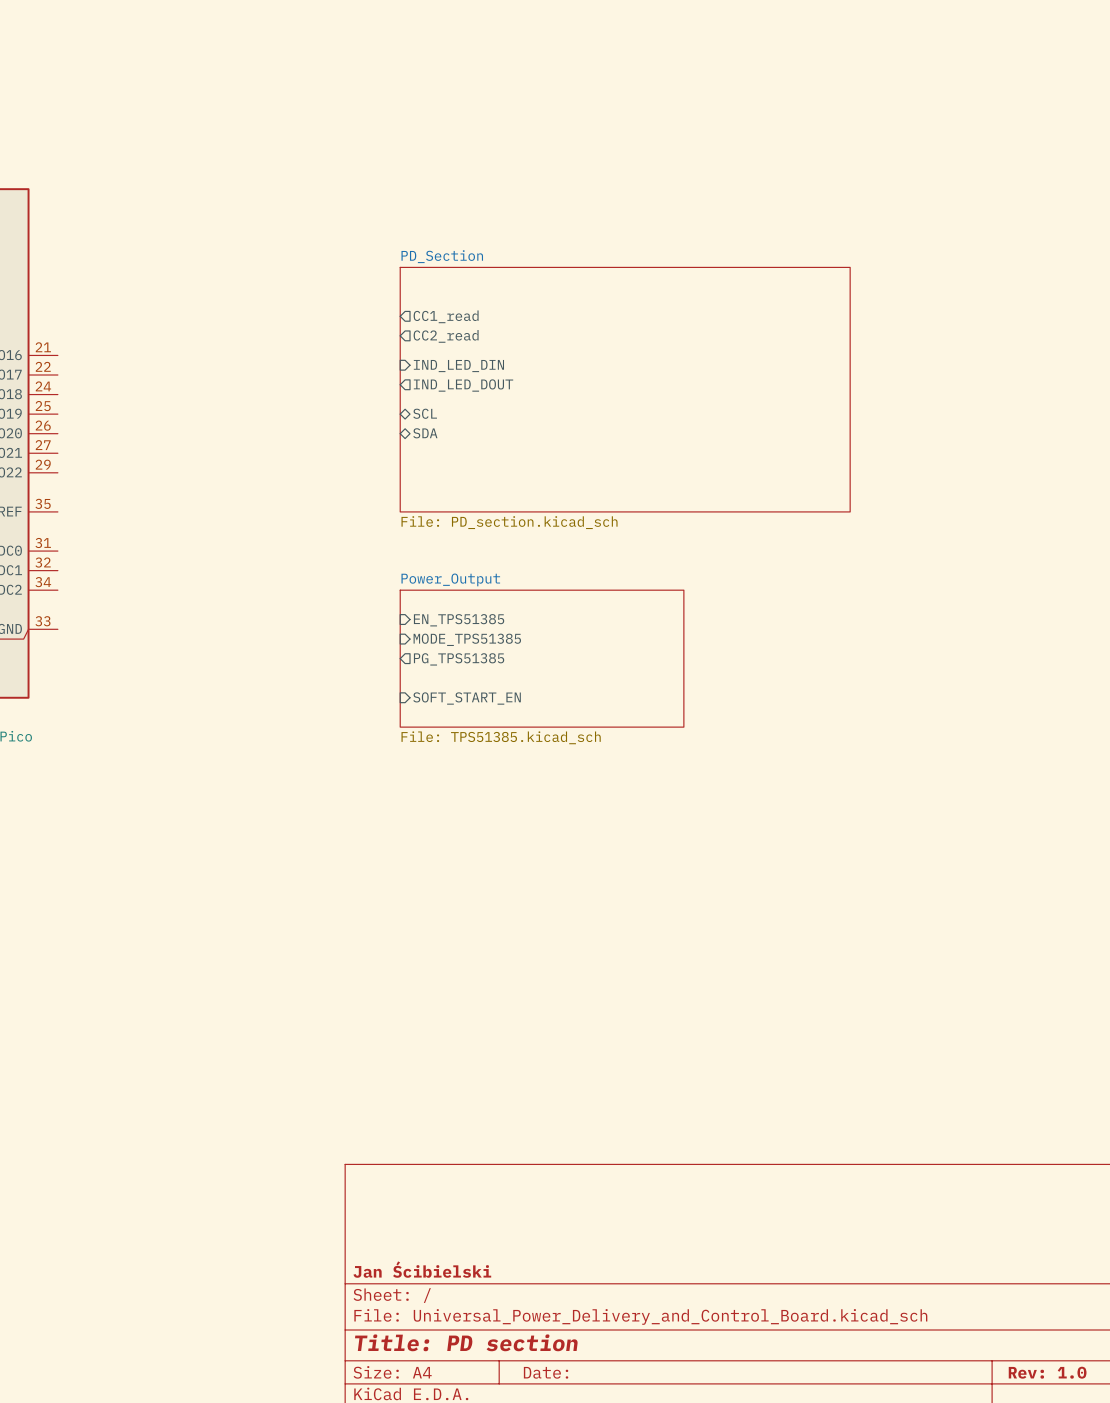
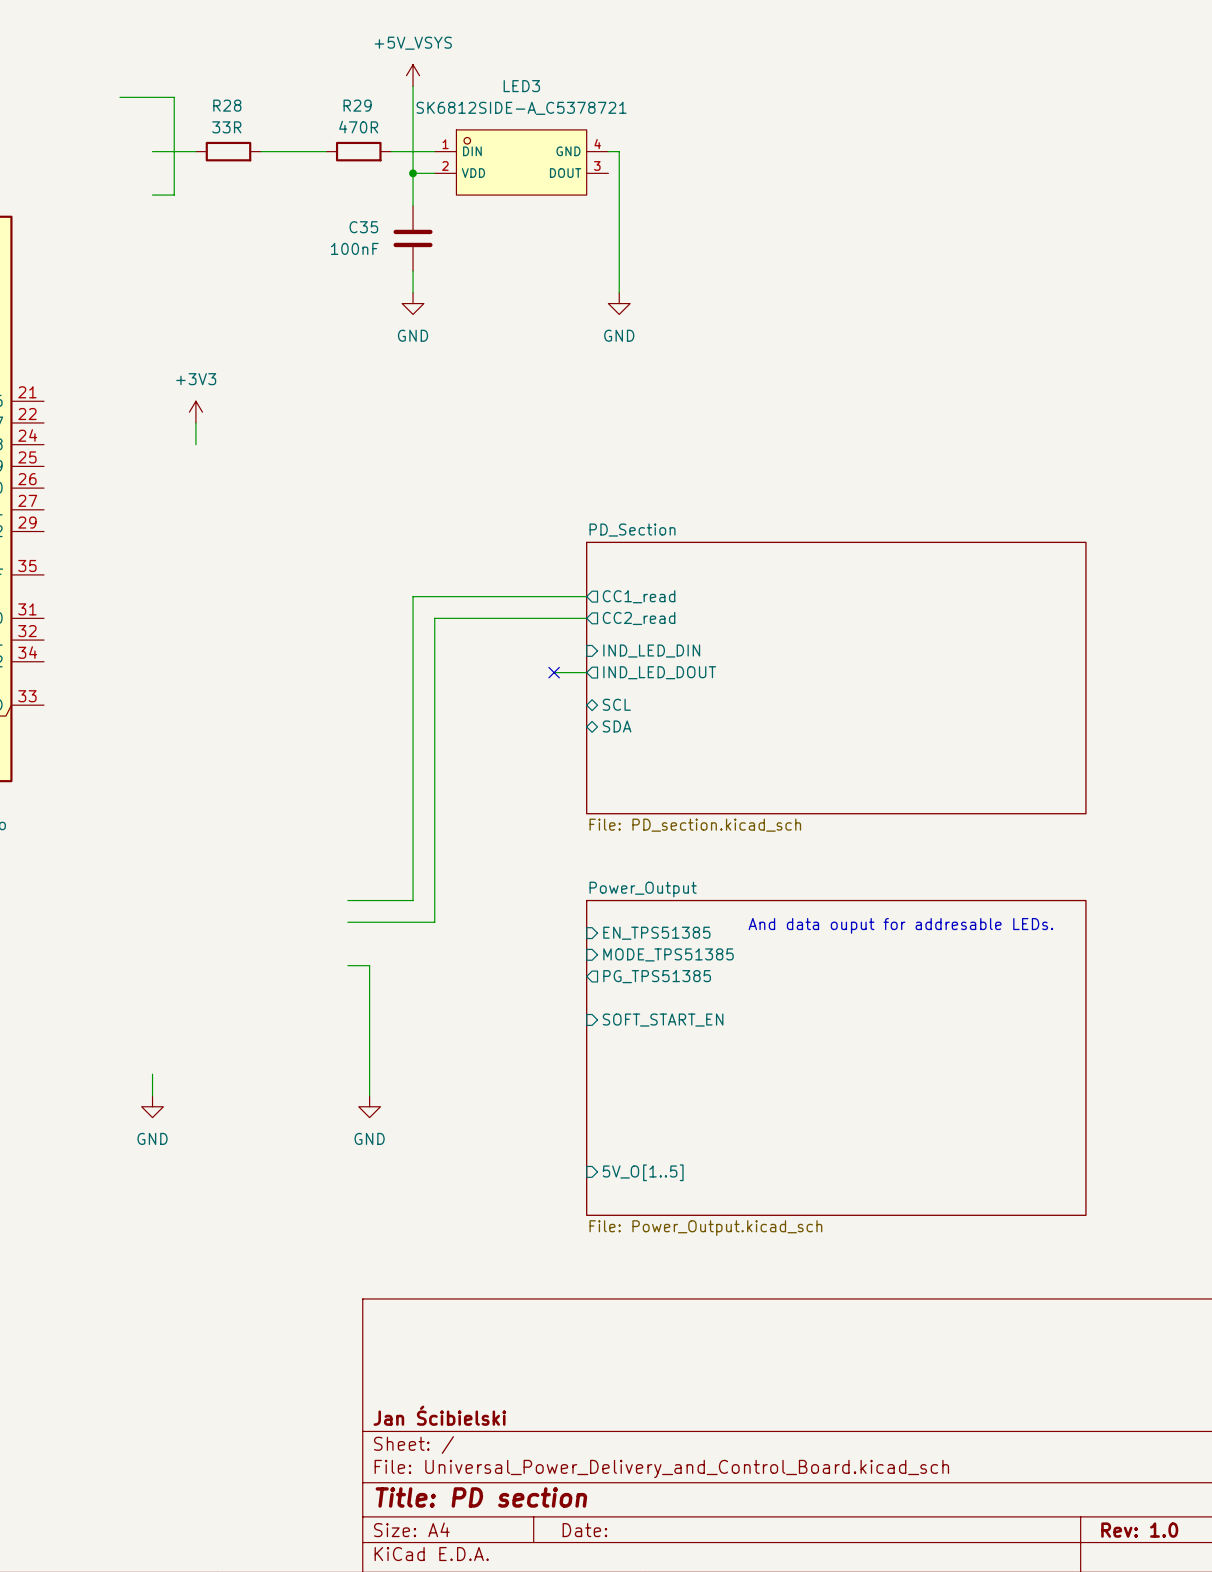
power symbol: none -> +5V_VSYS (413, 75)
wire: none -> (413, 86) (413, 205)
wire: none -> (119, 97) (174, 97) (174, 195) (152, 195)
wire: none -> (152, 151) (195, 151)
R28: none -> 33R (228, 151)
wire: none -> (261, 151) (326, 151)
R29: none -> 470R (358, 151)
wire: none -> (391, 151) (434, 151)
wire: none -> (608, 151) (619, 151) (619, 292)
LED3: none -> SK6812SIDE-A_C5378721 (521, 162)
wire: none -> (413, 173) (434, 173)
junction: none -> (413, 173)
C35: none -> 100nF (413, 238)
wire: none -> (413, 271) (413, 292)
power symbol: none -> GND (413, 303)
power symbol: none -> GND (619, 303)
sheet pin: CC1_read (446, 316) -> none
sheet pin: CC2_read (446, 336) -> none
power symbol: none -> +3V3 (195, 412)
sheet pin: IND_LED_DIN (458, 366) -> none
wire: none -> (195, 422) (195, 444)
sheet pin: IND_LED_DOUT (463, 385) -> none
sheet PD_Section: File: PD_section.kicad_sch (625, 389) -> none
sheet pin: SCL (425, 413) -> none
sheet pin: SDA (425, 433) -> none
wire: none -> (586, 596) (413, 596) (413, 900) (347, 900)
sheet pin: none -> CC1_read (639, 596)
wire: none -> (586, 618) (434, 618) (434, 922) (347, 922)
sheet pin: none -> CC2_read (639, 618)
sheet pin: none -> IND_LED_DIN (651, 651)
wire: none -> (554, 672) (586, 672)
no-connect mark: none -> (554, 672)
sheet pin: none -> IND_LED_DOUT (659, 672)
sheet PD_Section: none -> File: PD_section.kicad_sch (836, 678)
sheet pin: EN_TPS51385 (459, 620) -> none
sheet pin: none -> SCL (616, 704)
sheet pin: MODE_TPS51385 (467, 639) -> none
sheet pin: none -> SDA (617, 726)
sheet Power_Output: File: TPS51385.kicad_sch (542, 658) -> none
sheet pin: PG_TPS51385 (459, 659) -> none
sheet pin: SOFT_START_EN (467, 698) -> none
text: none -> And data ouput for addresable LEDs. (900, 925)
sheet pin: none -> EN_TPS51385 (656, 933)
sheet pin: none -> MODE_TPS51385 (668, 954)
wire: none -> (347, 965) (369, 965) (369, 1095)
sheet pin: none -> PG_TPS51385 (657, 976)
sheet pin: none -> SOFT_START_EN (663, 1020)
sheet Power_Output: none -> File: Power_Output.kicad_sch (836, 1057)
wire: none -> (152, 1074) (152, 1095)
power symbol: none -> GND (152, 1106)
power symbol: none -> GND (369, 1106)
sheet pin: none -> 5V_O[1..5] (643, 1172)

